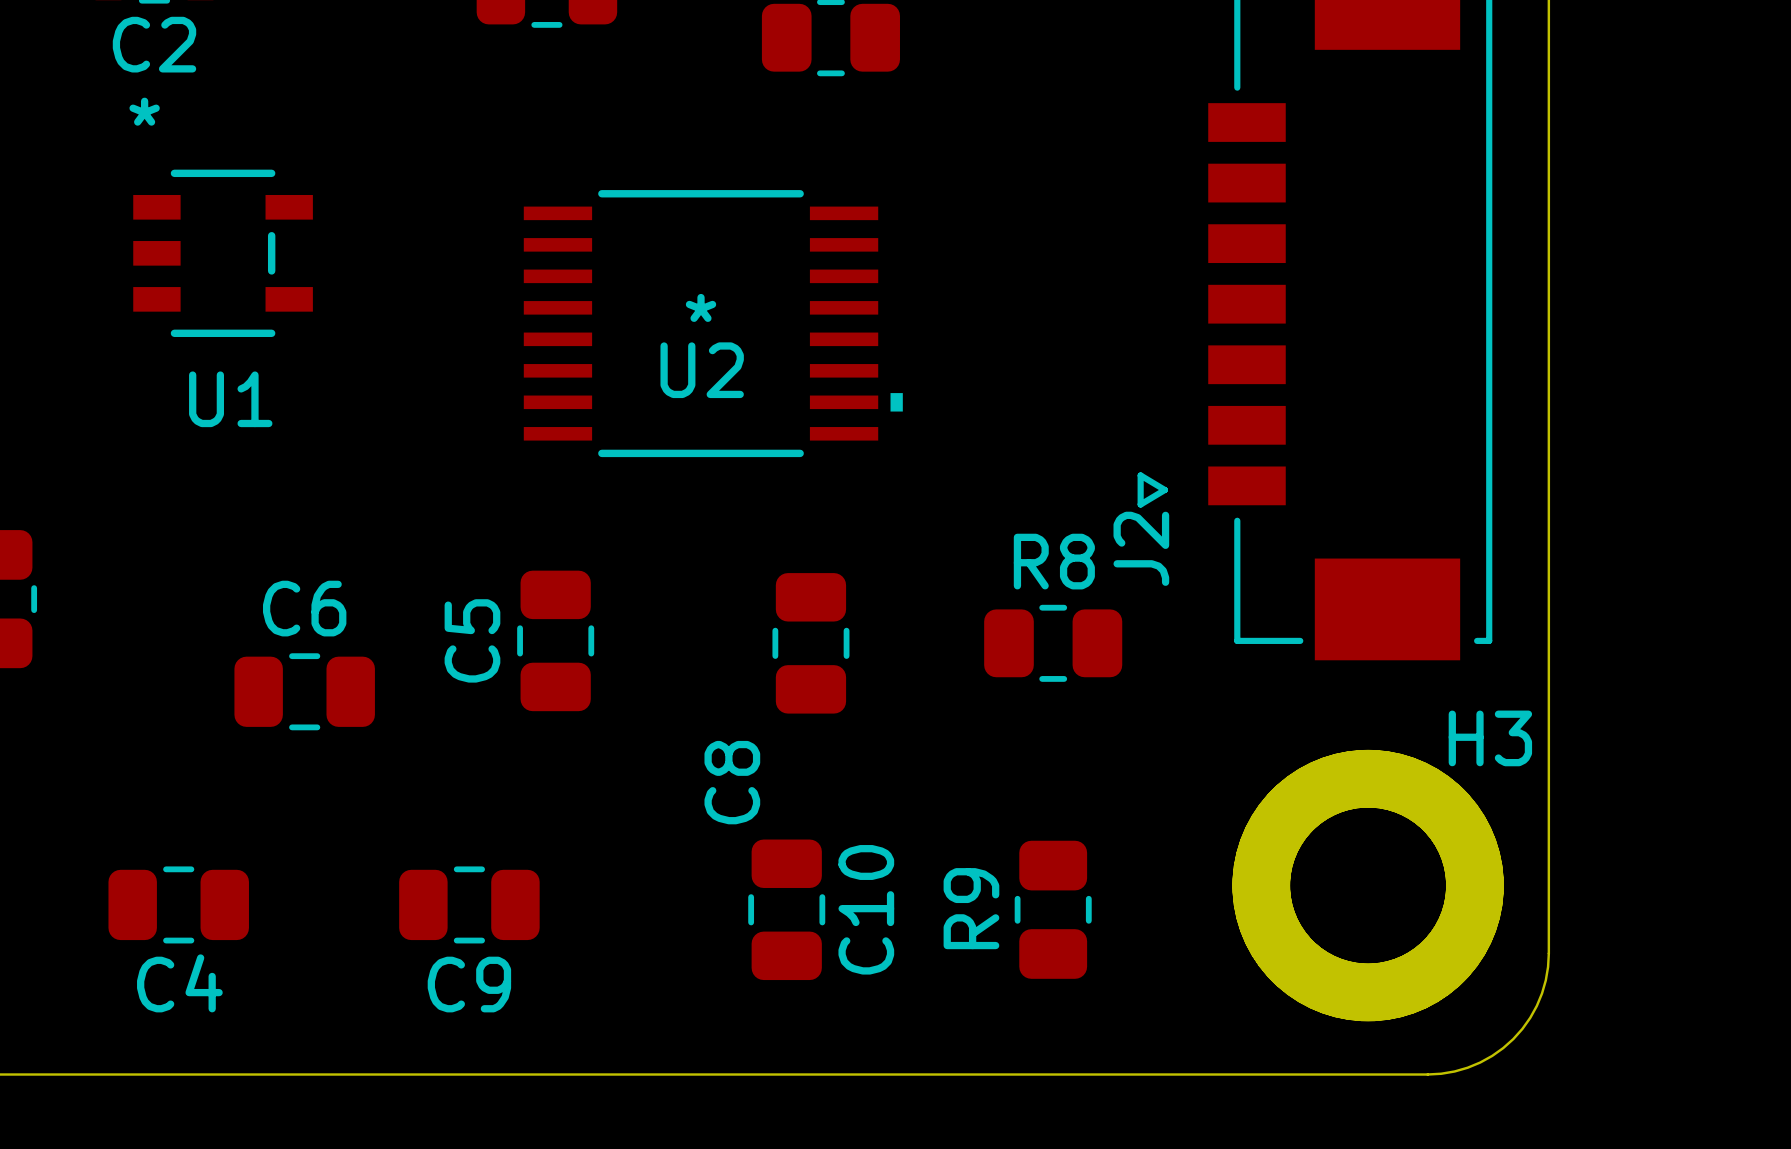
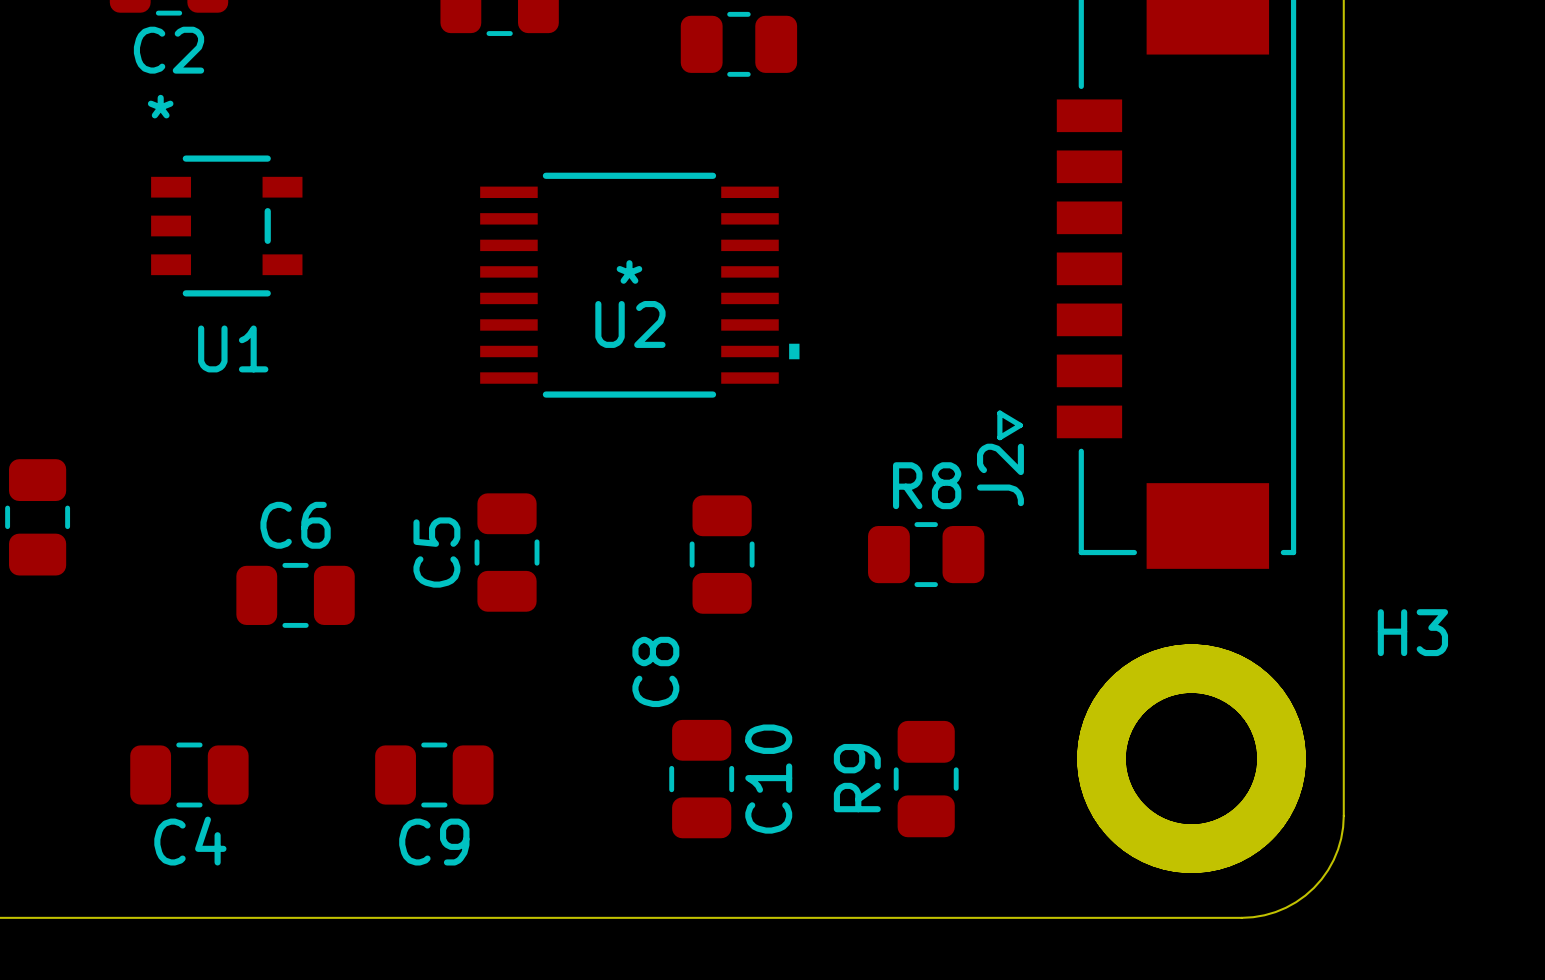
H3 name position: H3 (1490, 738) -> H3 (1412, 632)

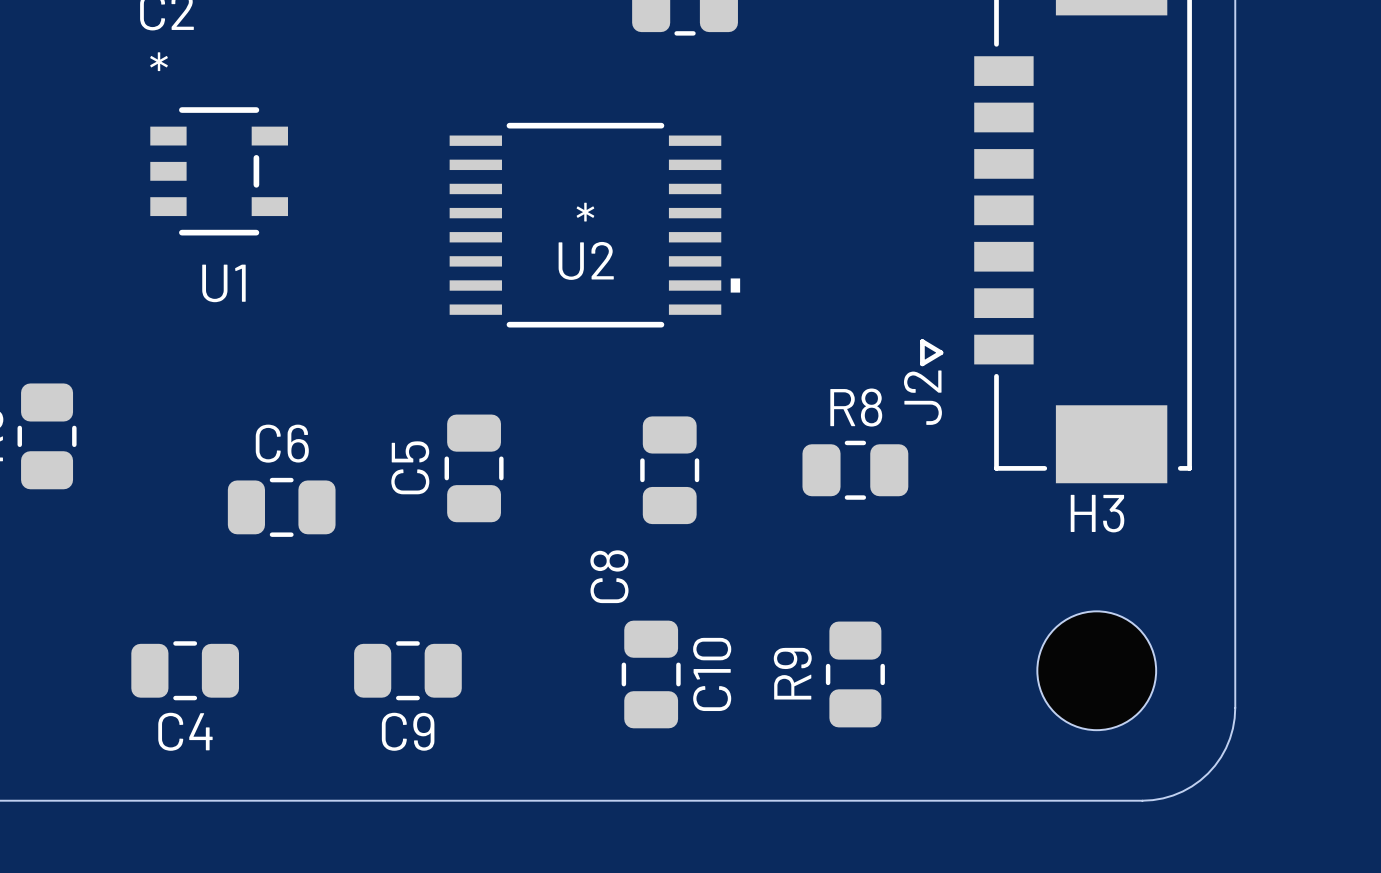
H3 name position: H3 (1412, 632) -> H3 (1097, 513)
H3 footprint: [1077, 644, 1306, 873] -> [1037, 611, 1157, 731]
part: (1191, 758) -> none

